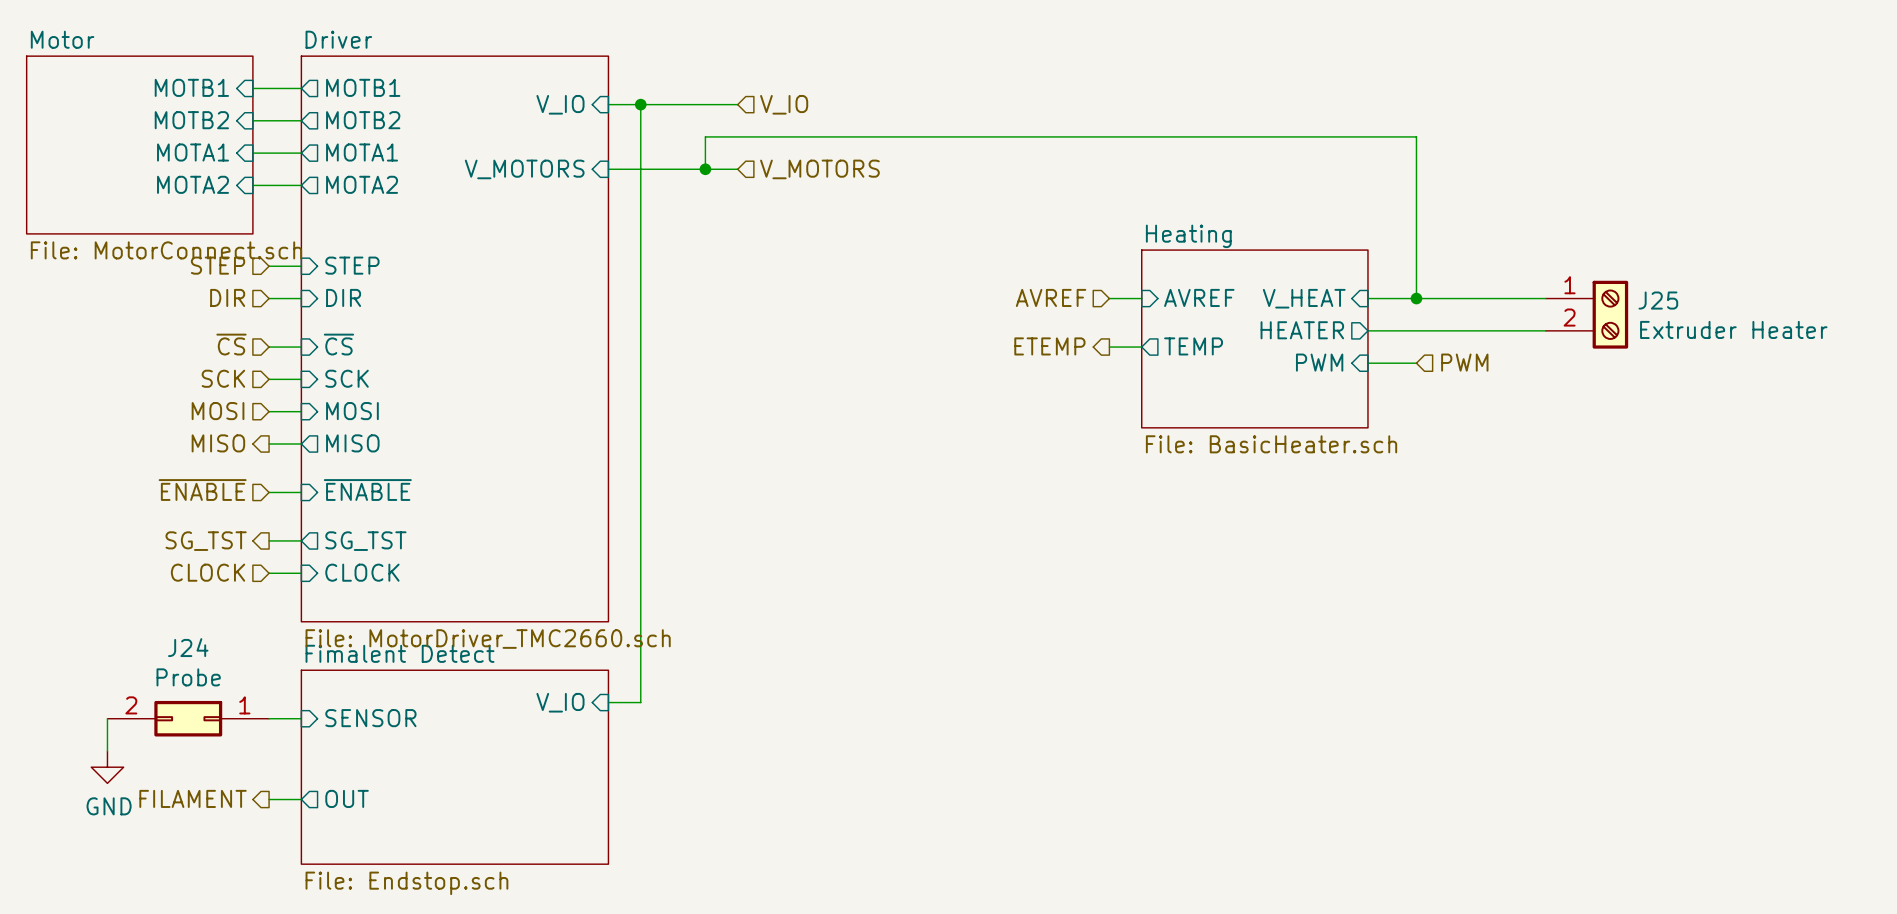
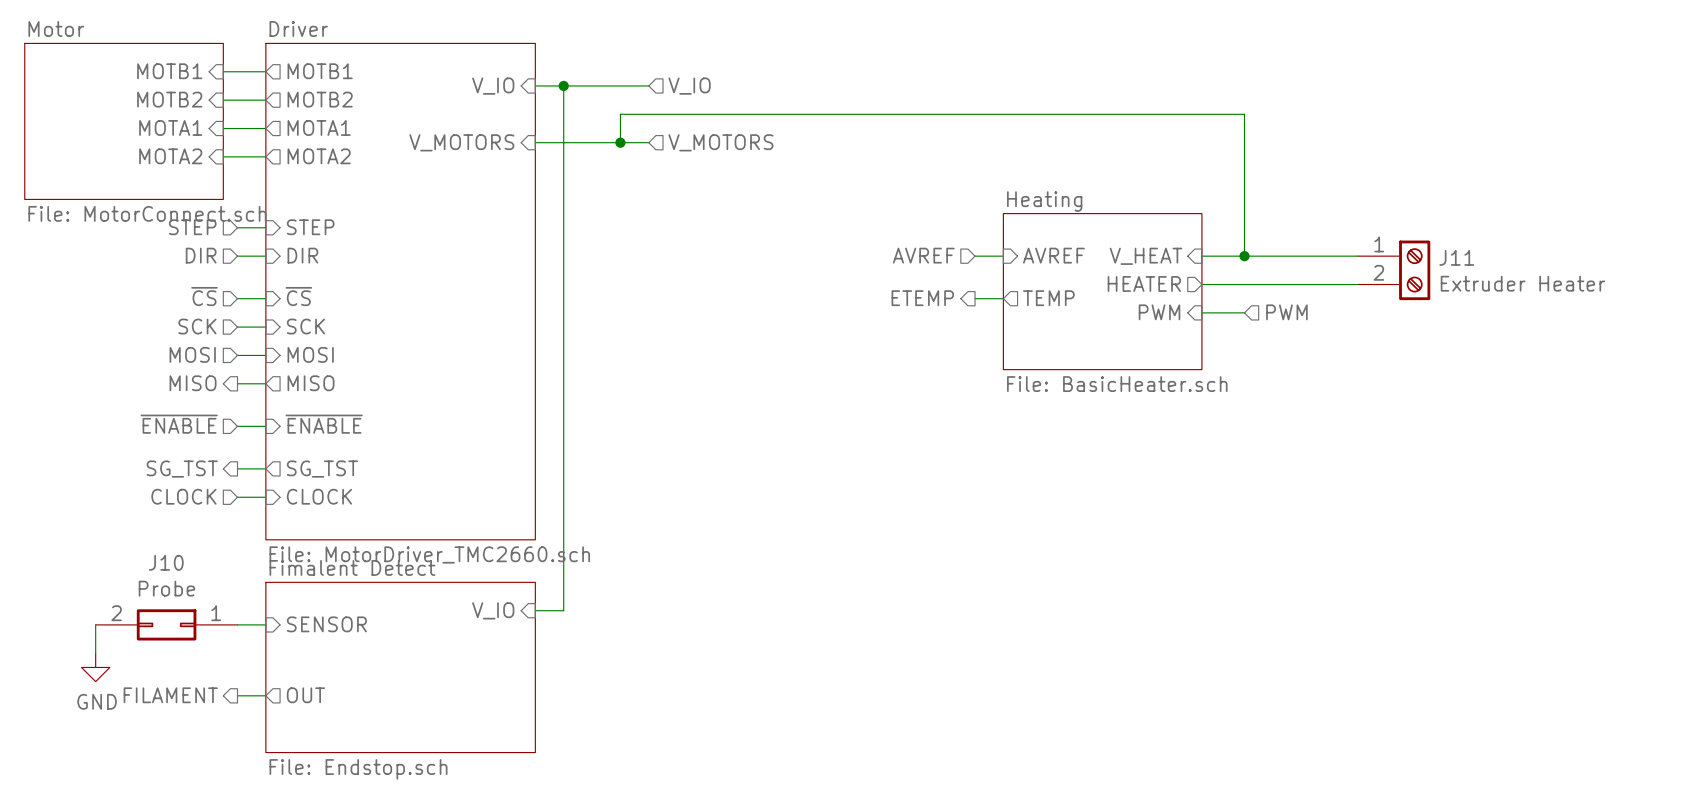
J25 name: J25 (1658, 300) -> J11 (1456, 257)
J24 name: J24 (188, 647) -> J10 (166, 562)

